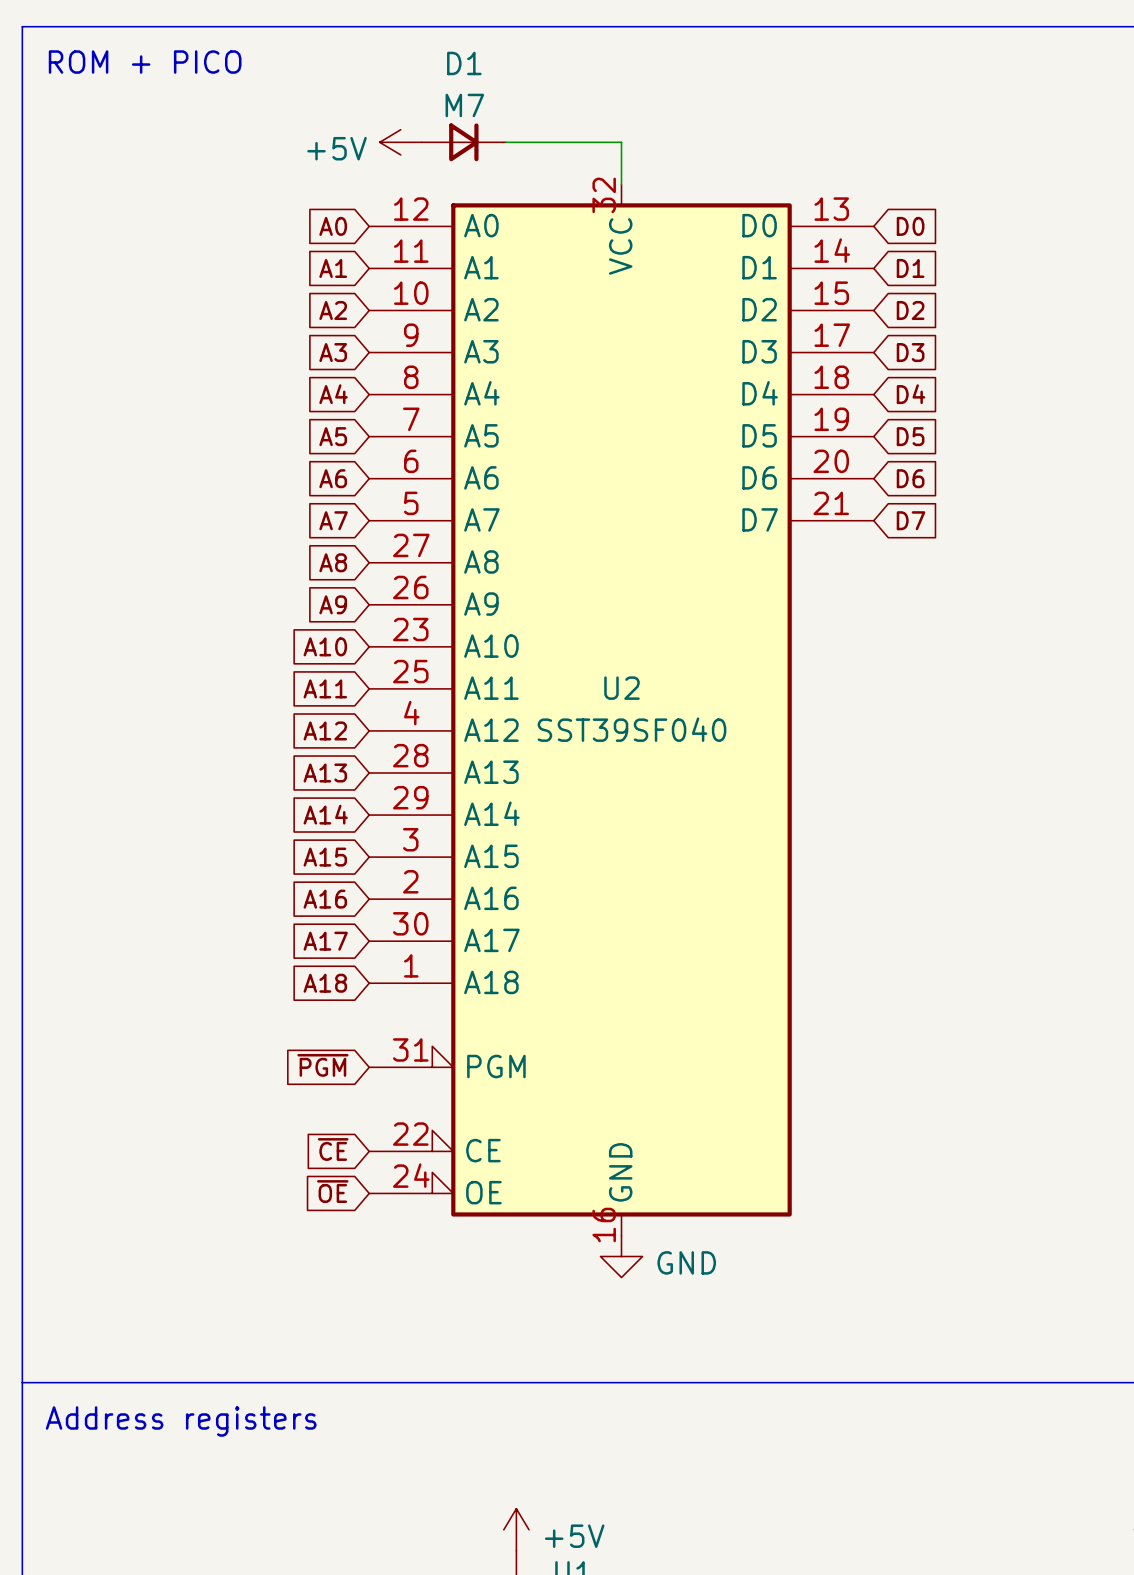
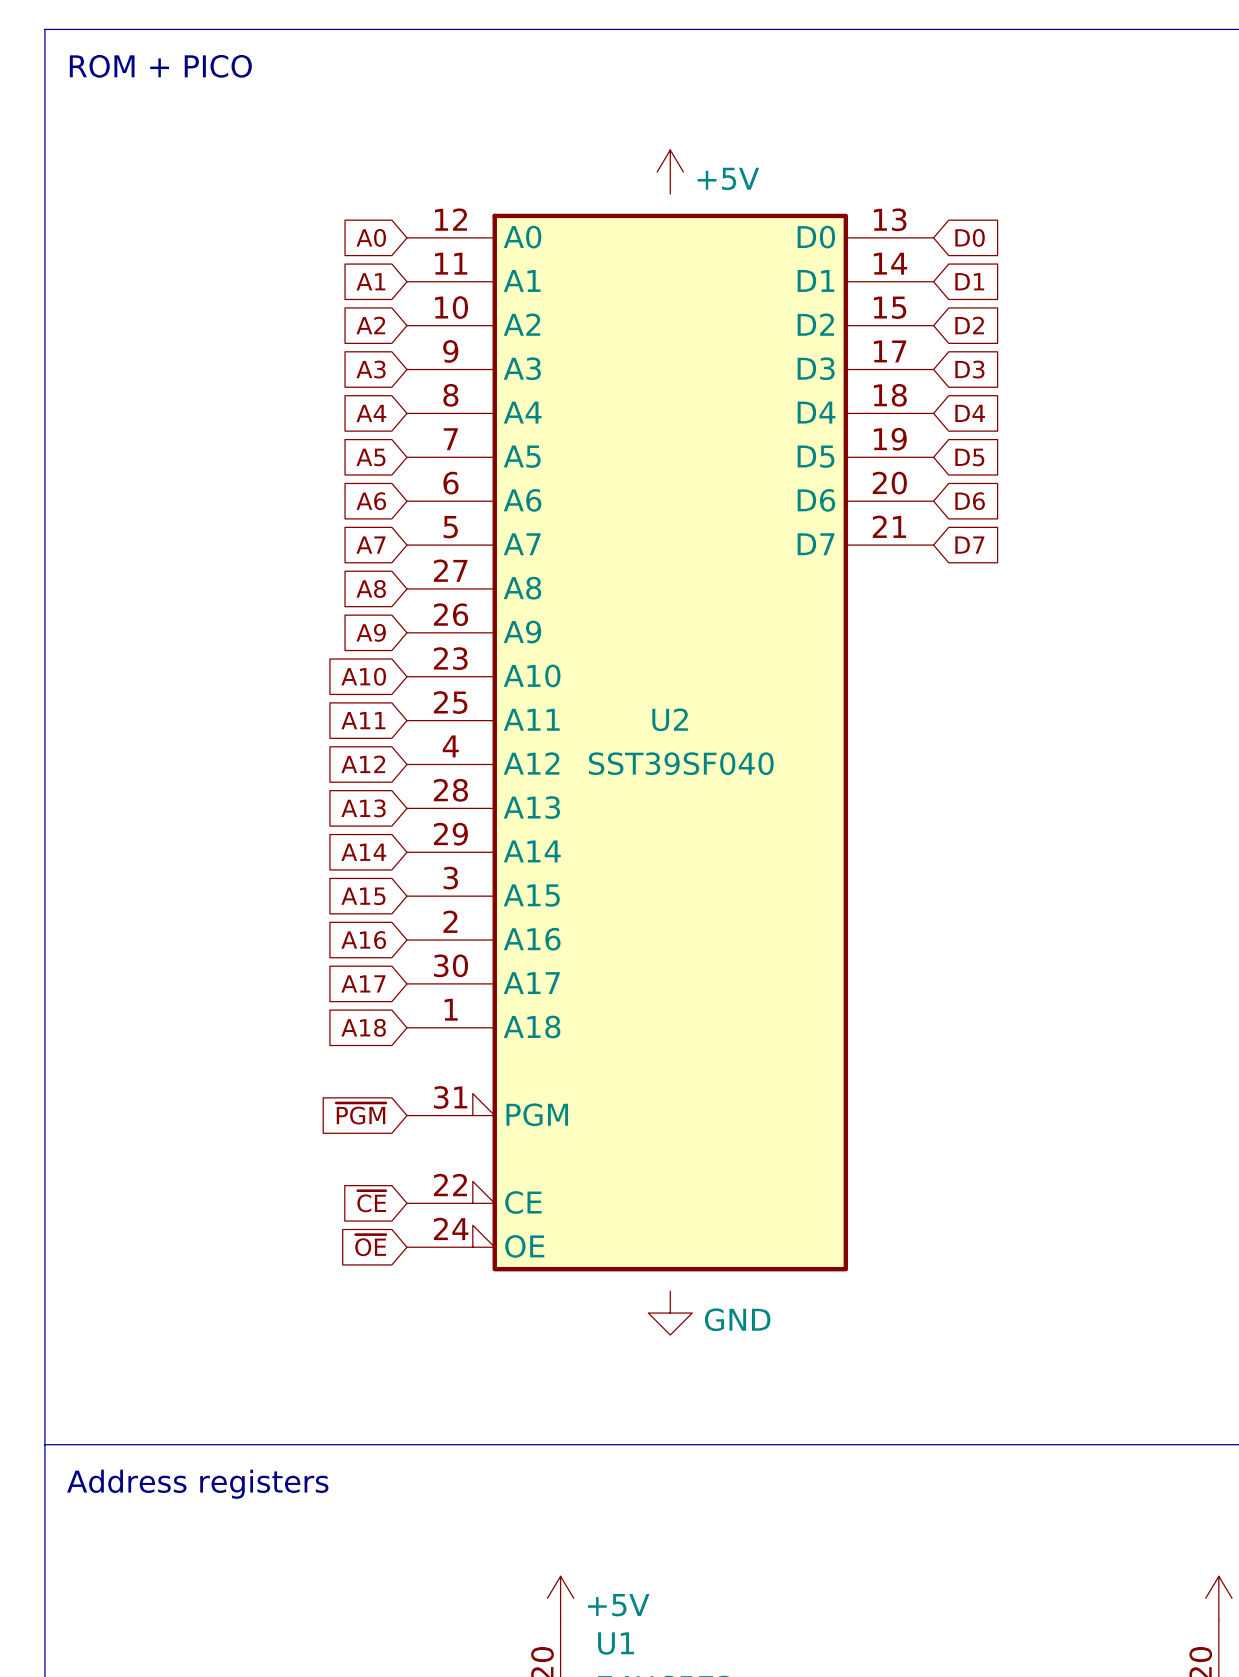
power symbol rotation: 0° (400, 142) -> 90° clockwise (670, 172)
power symbol position: +5V (400, 142) -> +5V (670, 172)
D1: M7 (463, 142) -> none
wire: (505, 142) (621, 142) (621, 184) -> none
power symbol text position: +5V (337, 148) -> +5V (728, 178)
U2 symbol: [369, 184, 874, 1236] -> [406, 213, 934, 1272]

